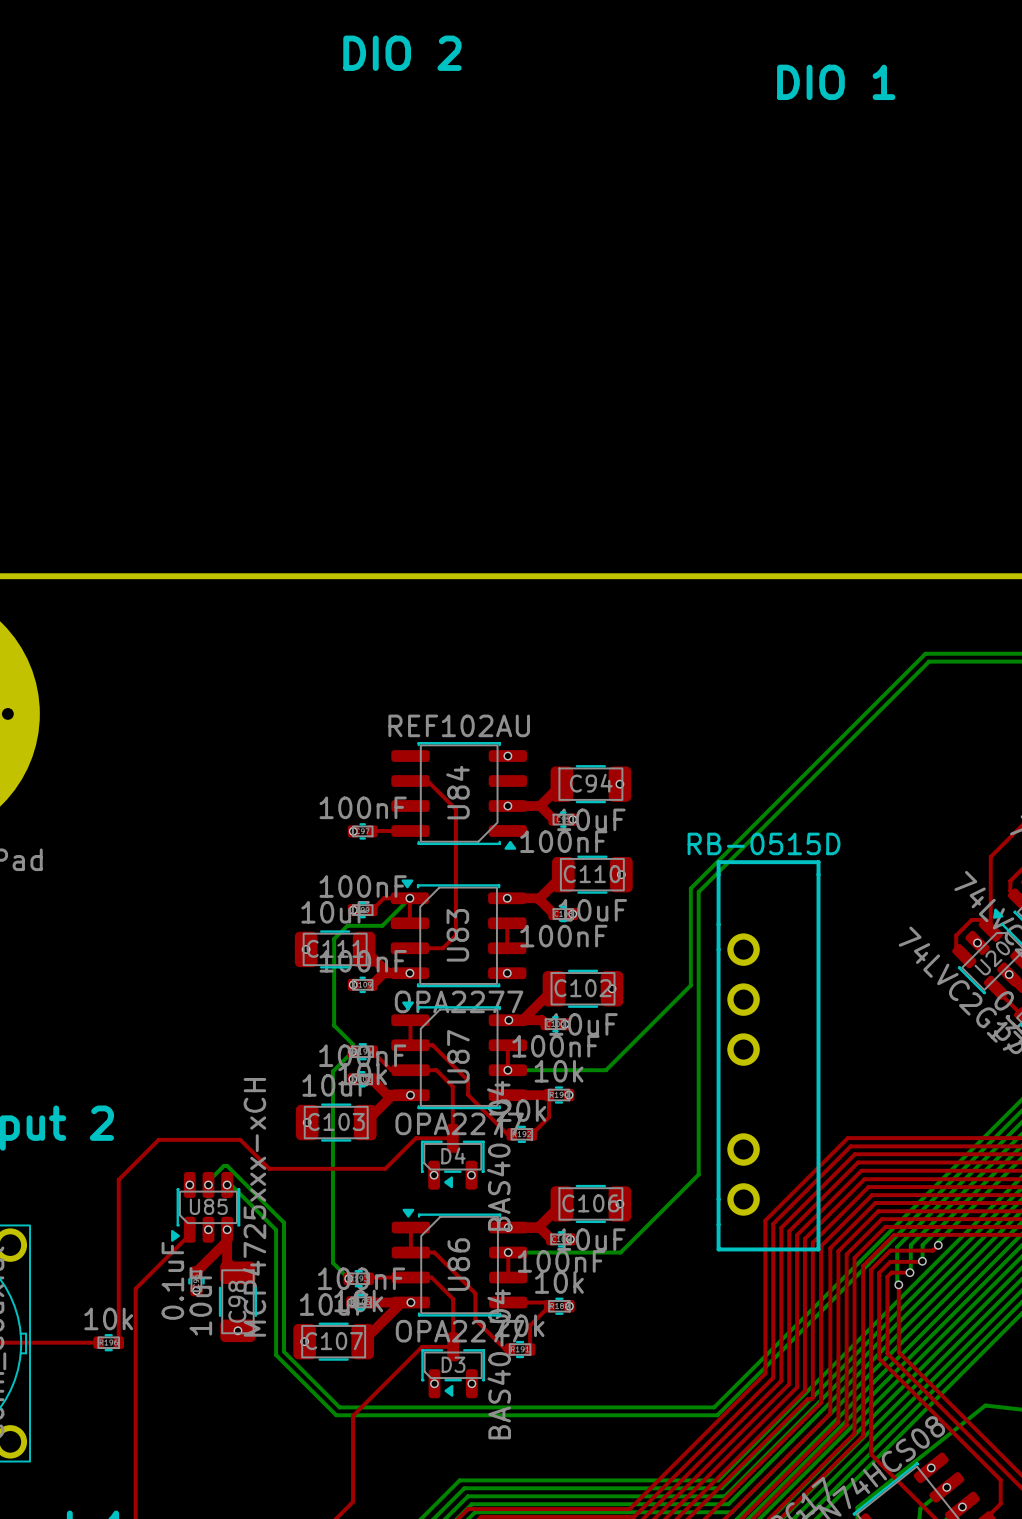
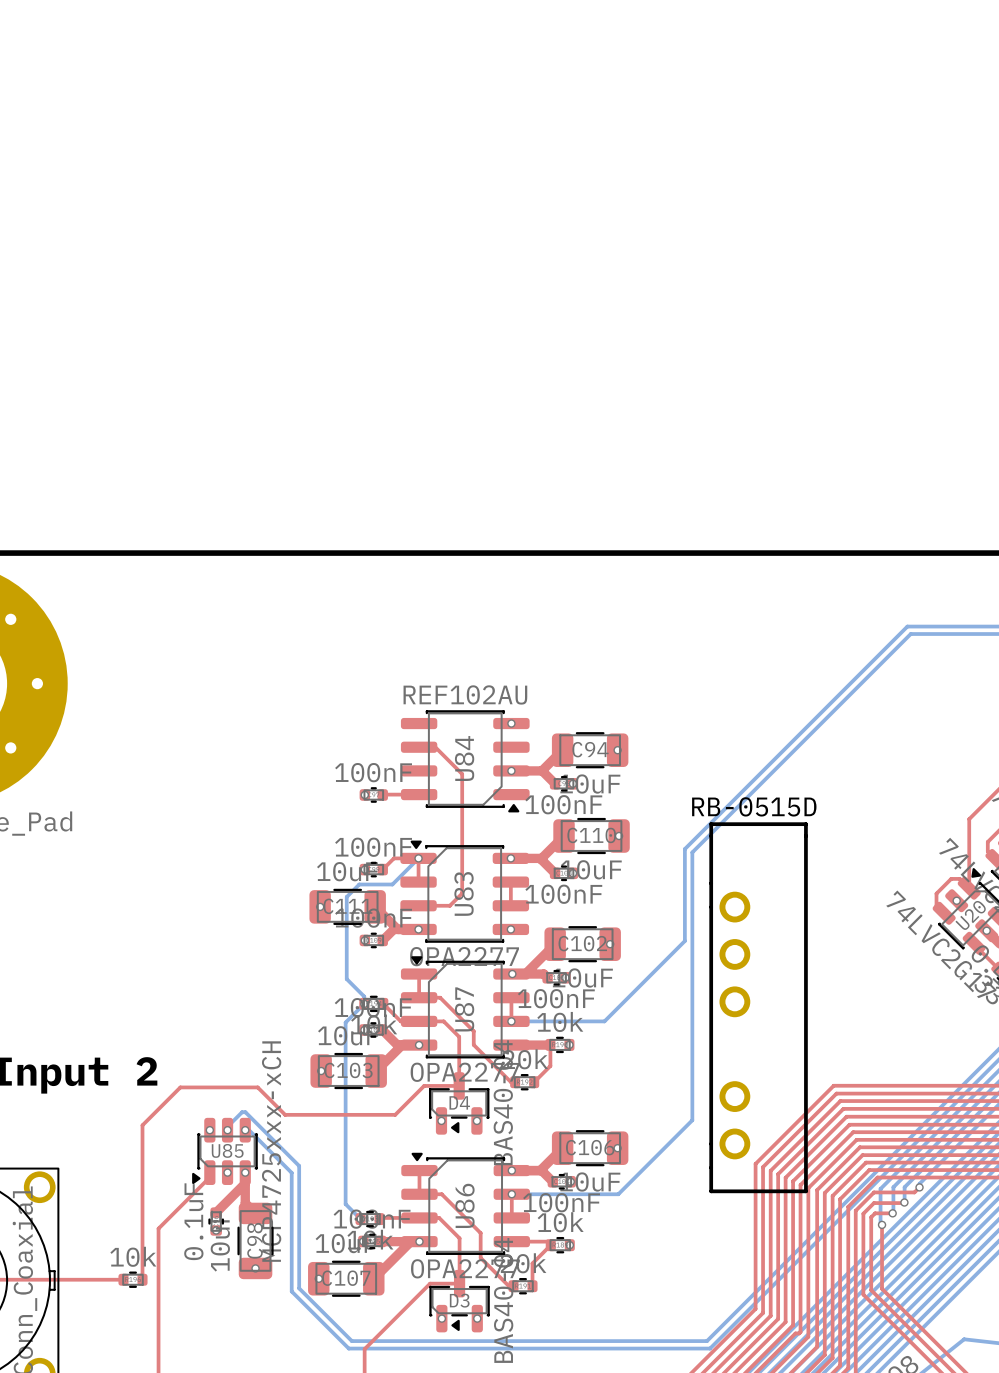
text: DIO 2 (402, 53) -> none
text: DIO 1 (836, 82) -> none

